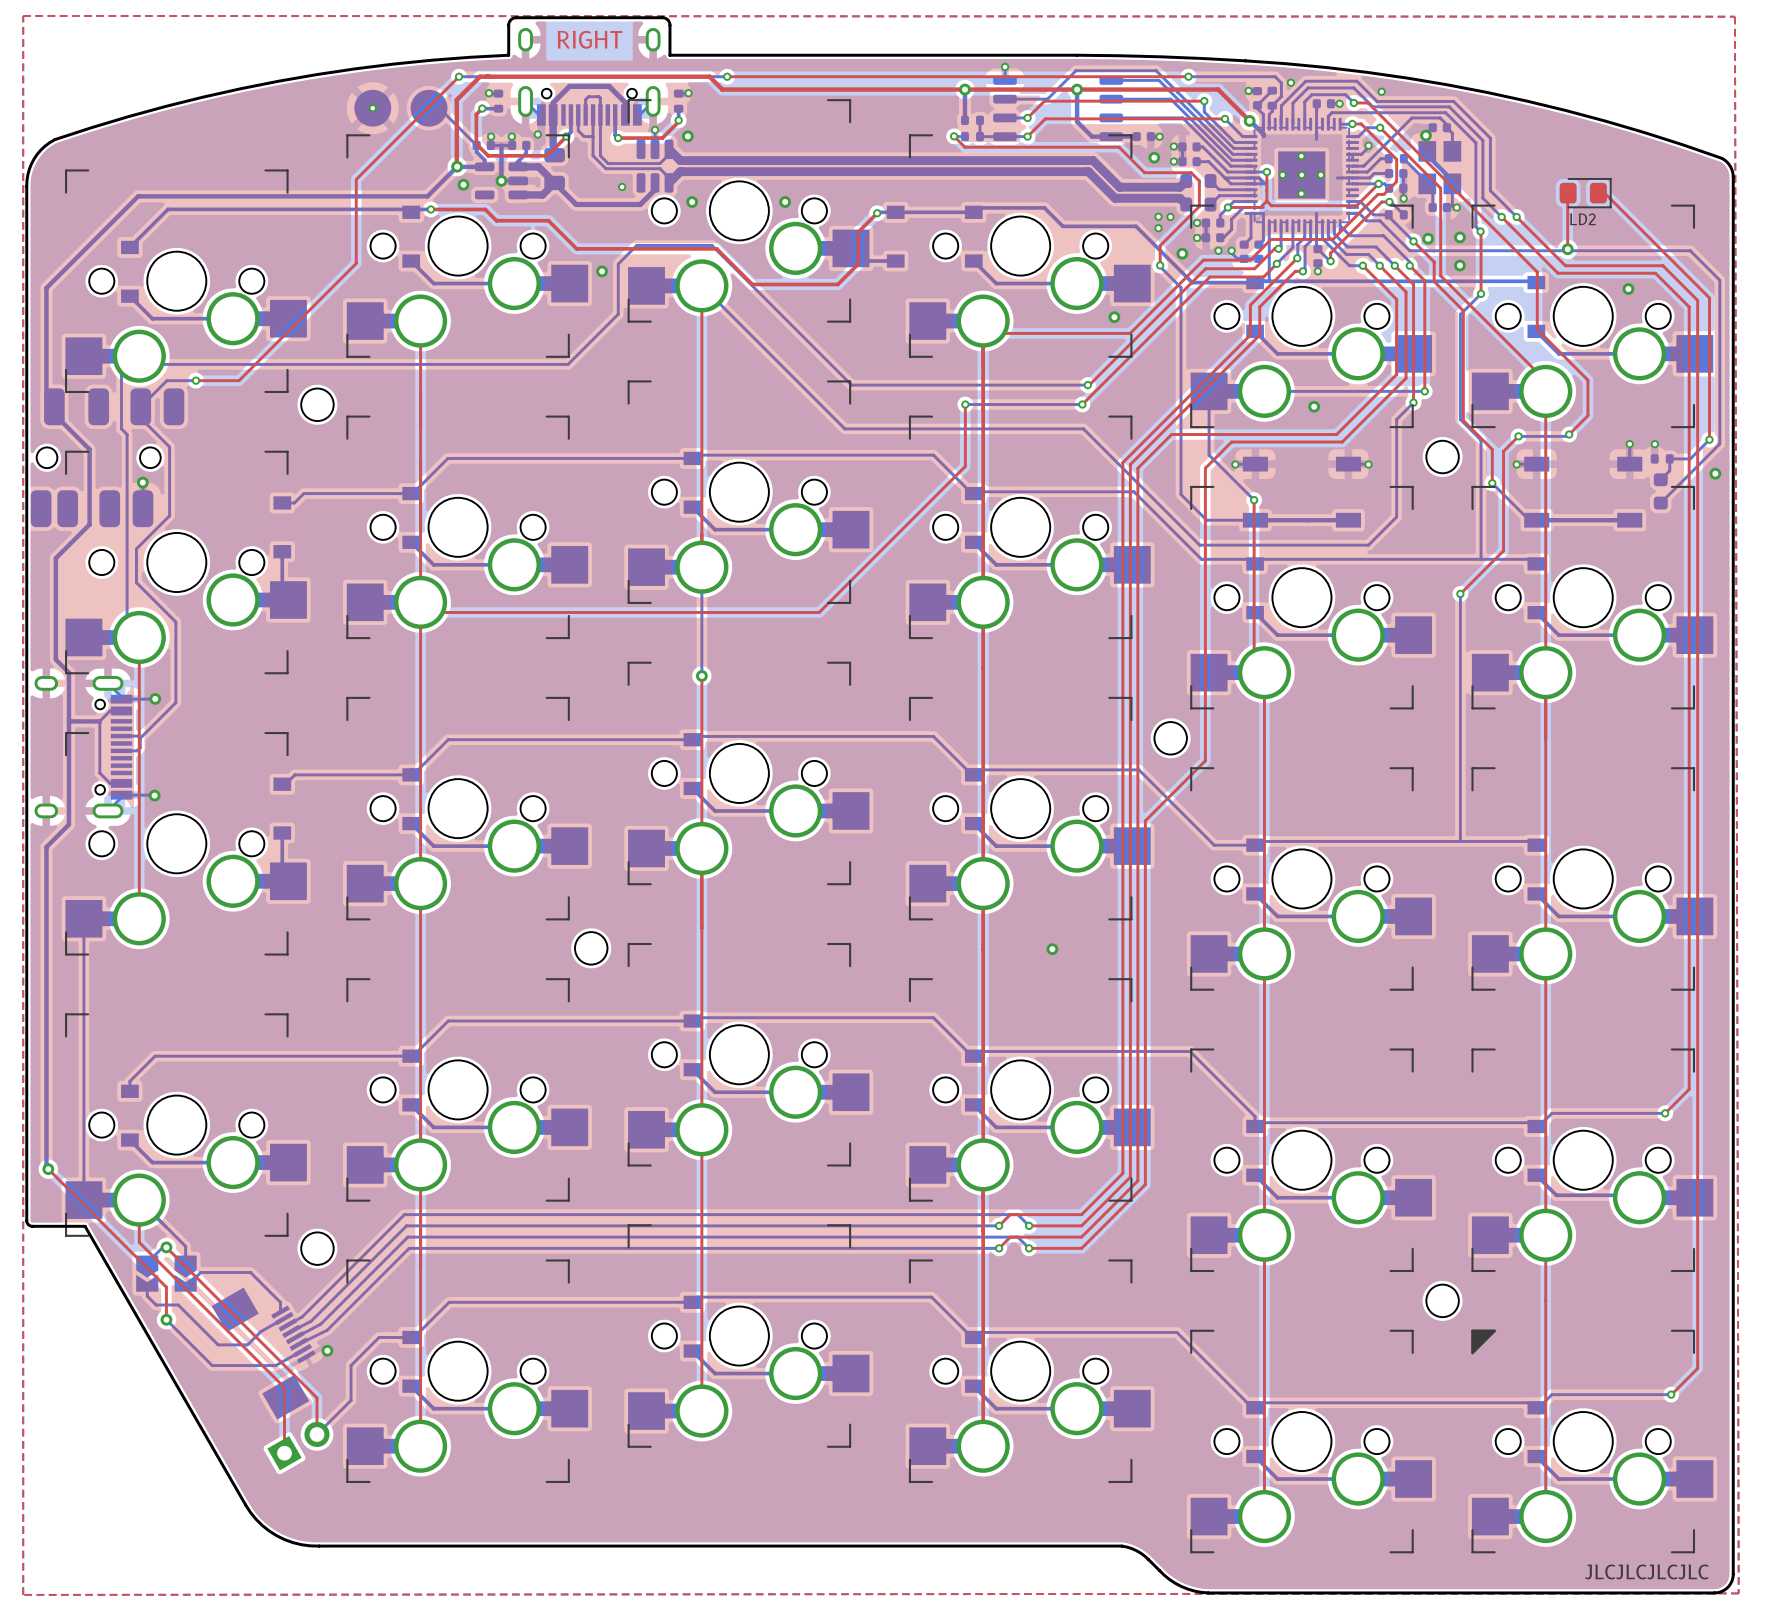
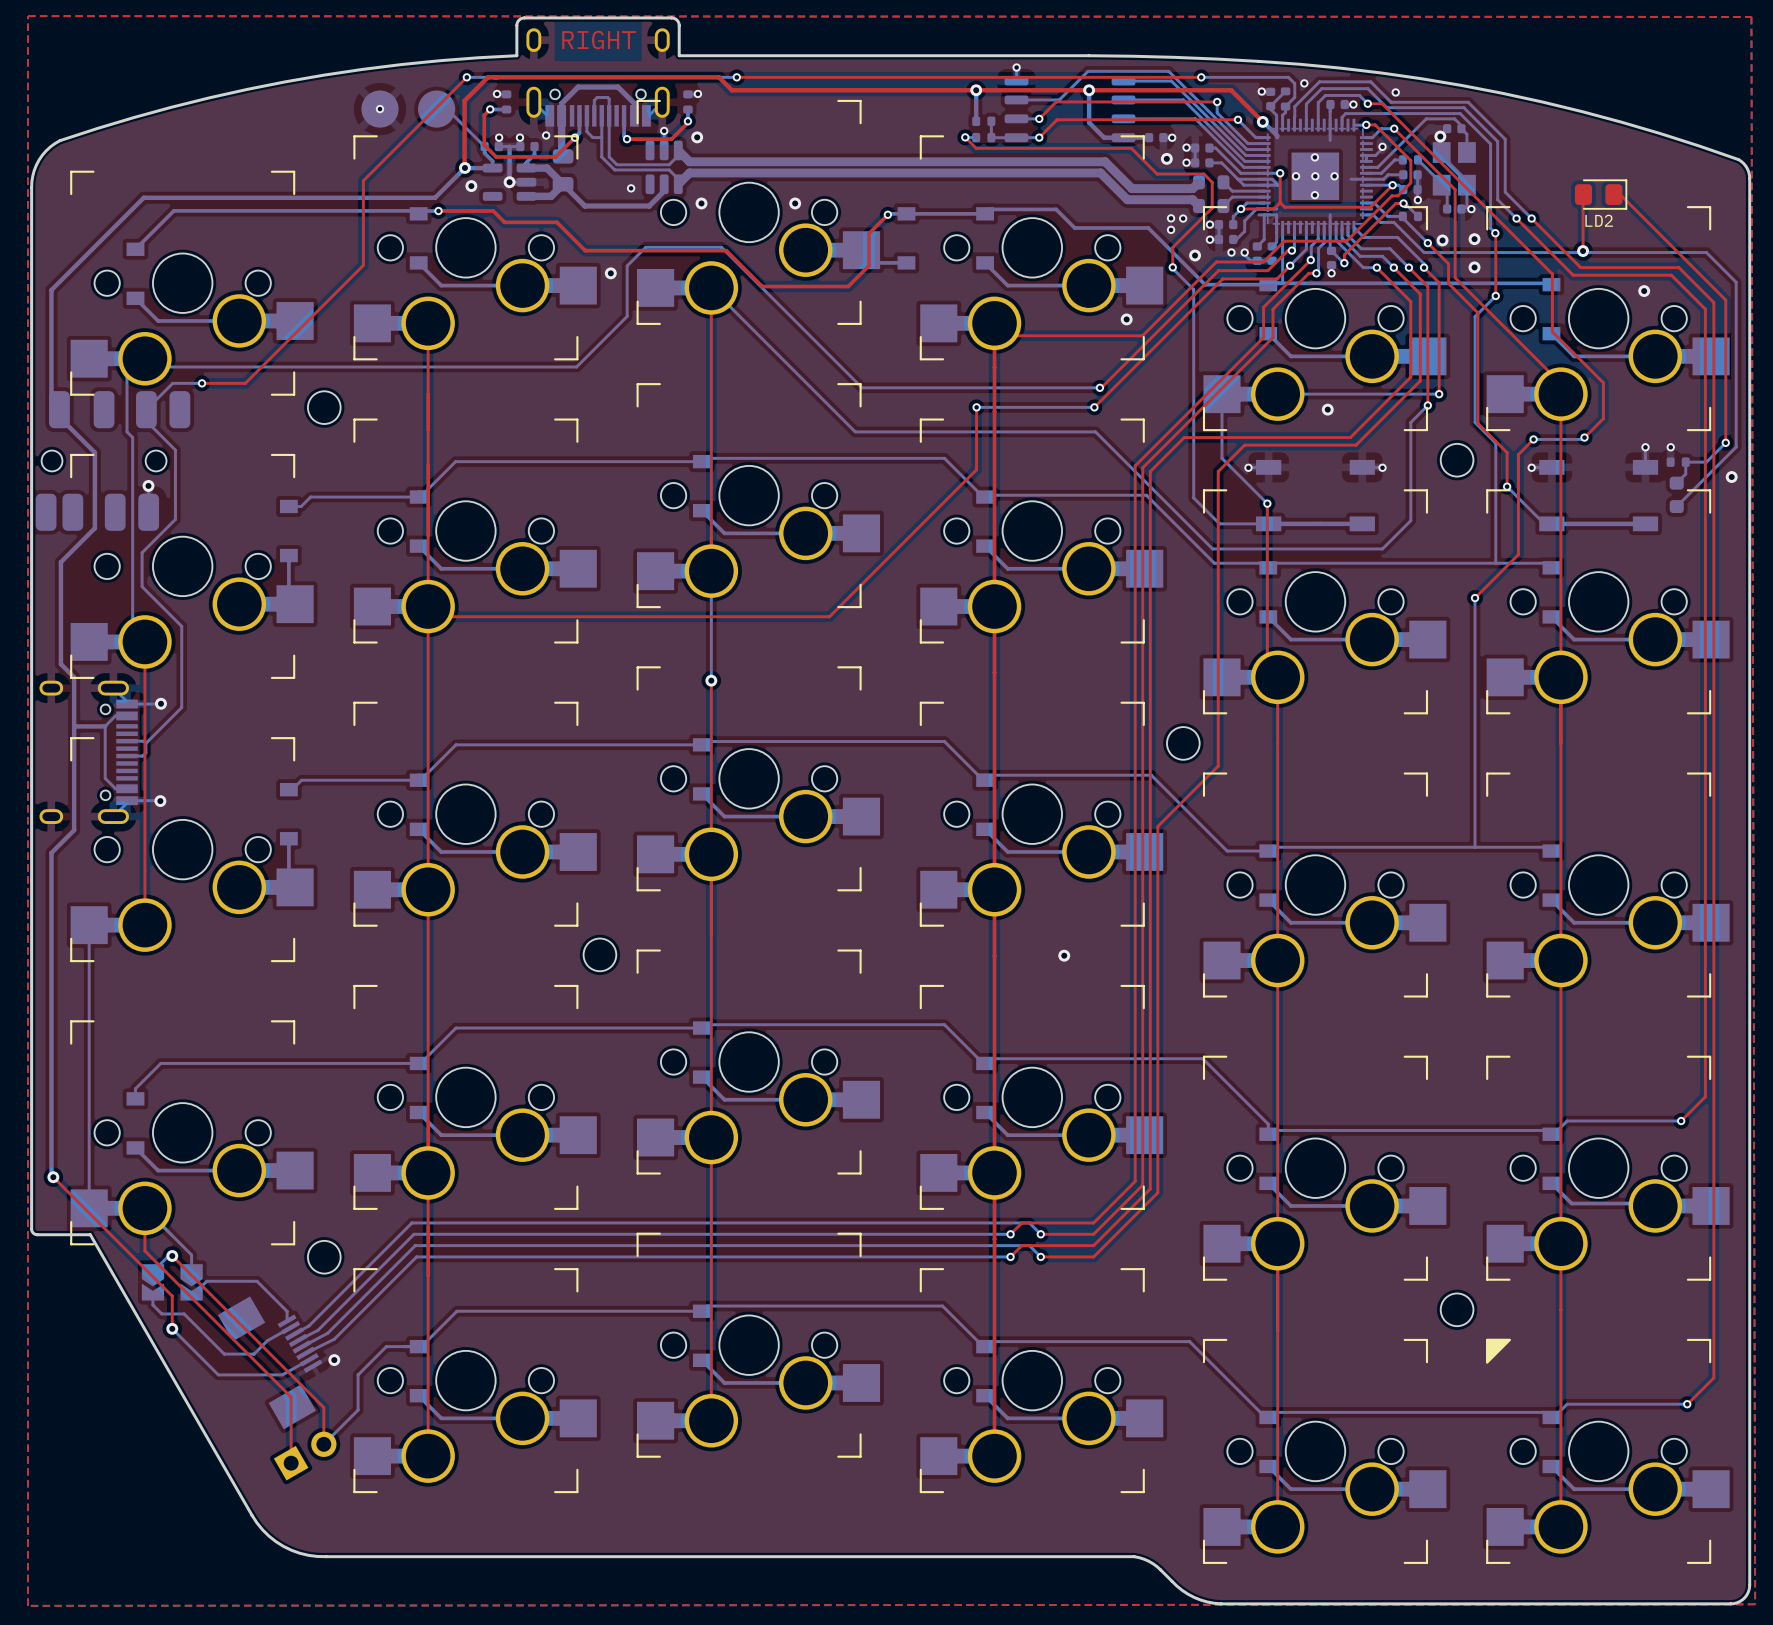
text: JLCJLCJLCJLC (1646, 1571) -> none

